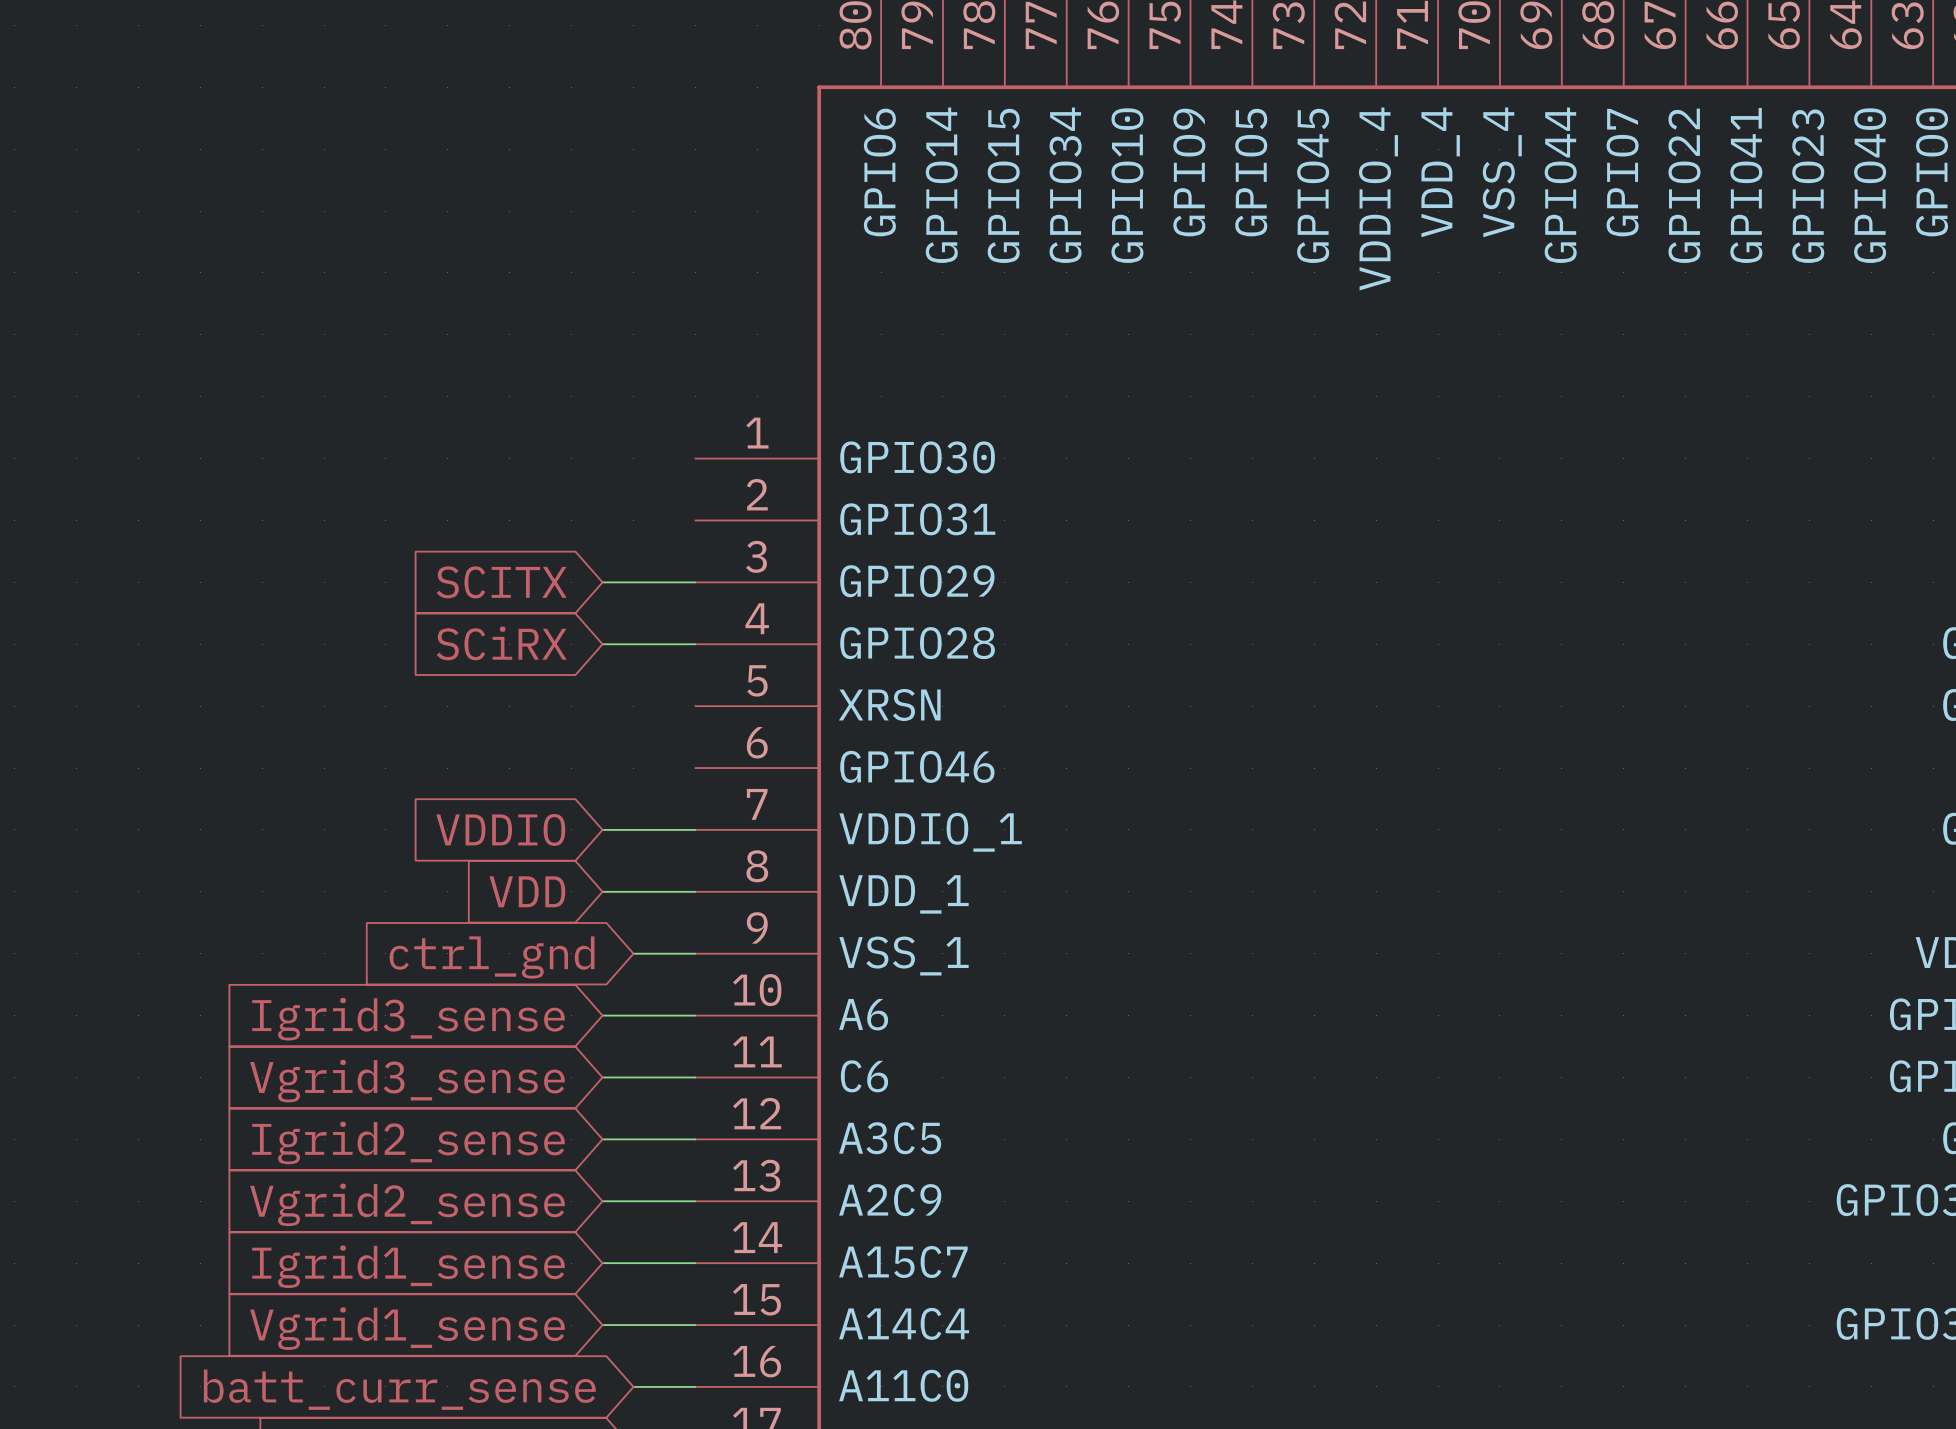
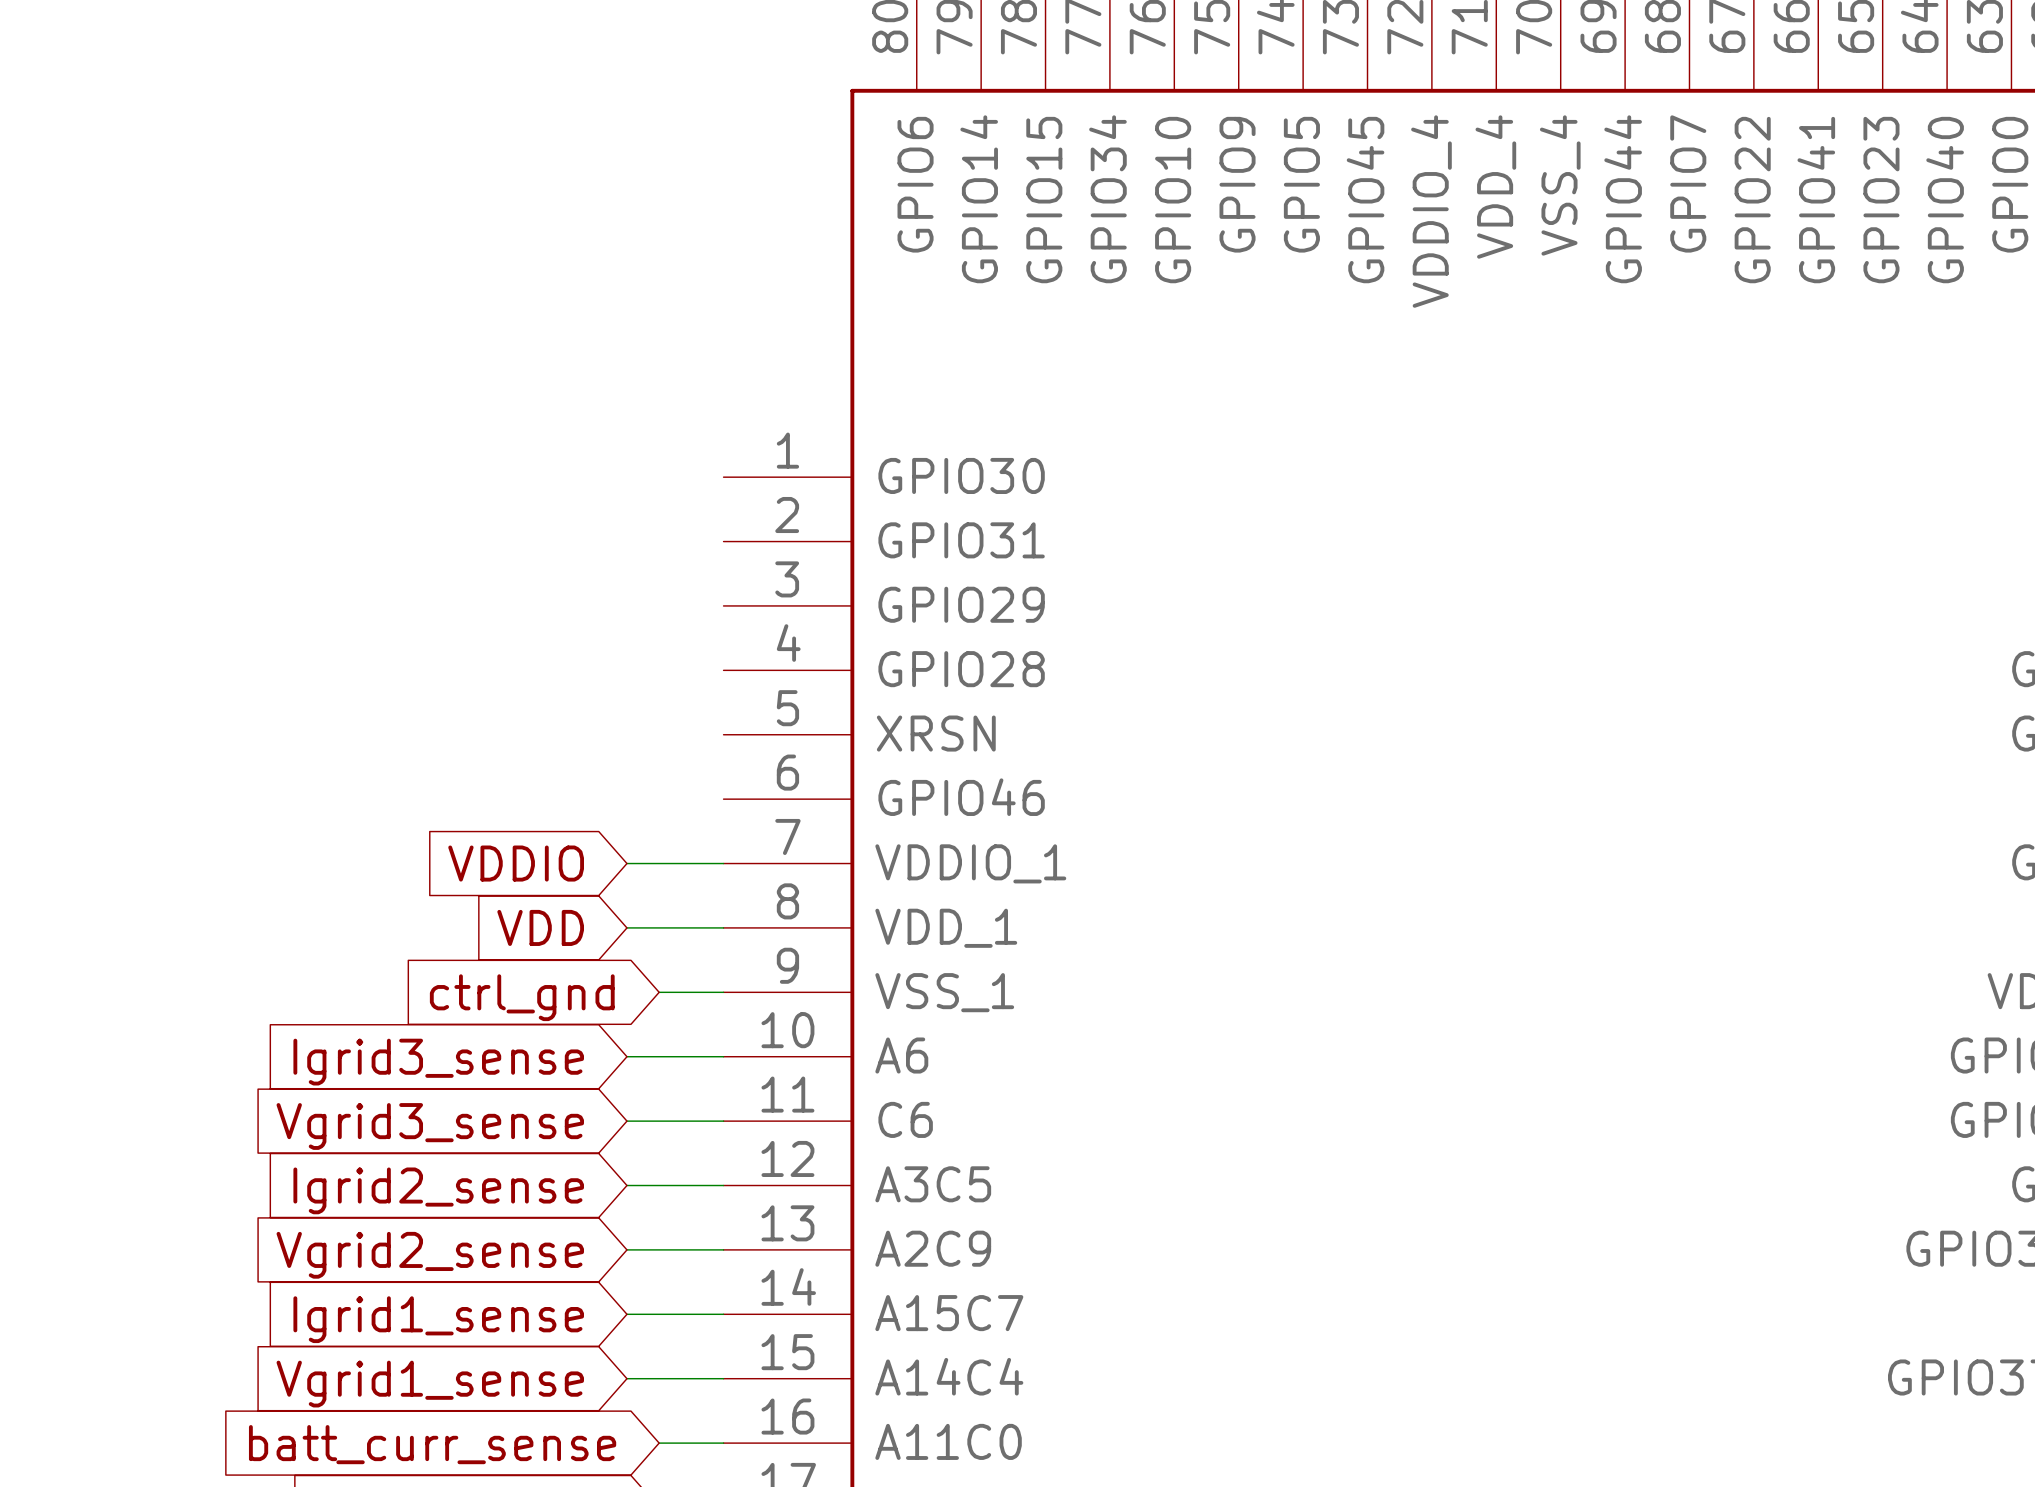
global label: SCITX (501, 582) -> none
wire: (602, 582) (695, 582) -> none
global label: SCiRX (501, 643) -> none
wire: (602, 644) (695, 644) -> none

